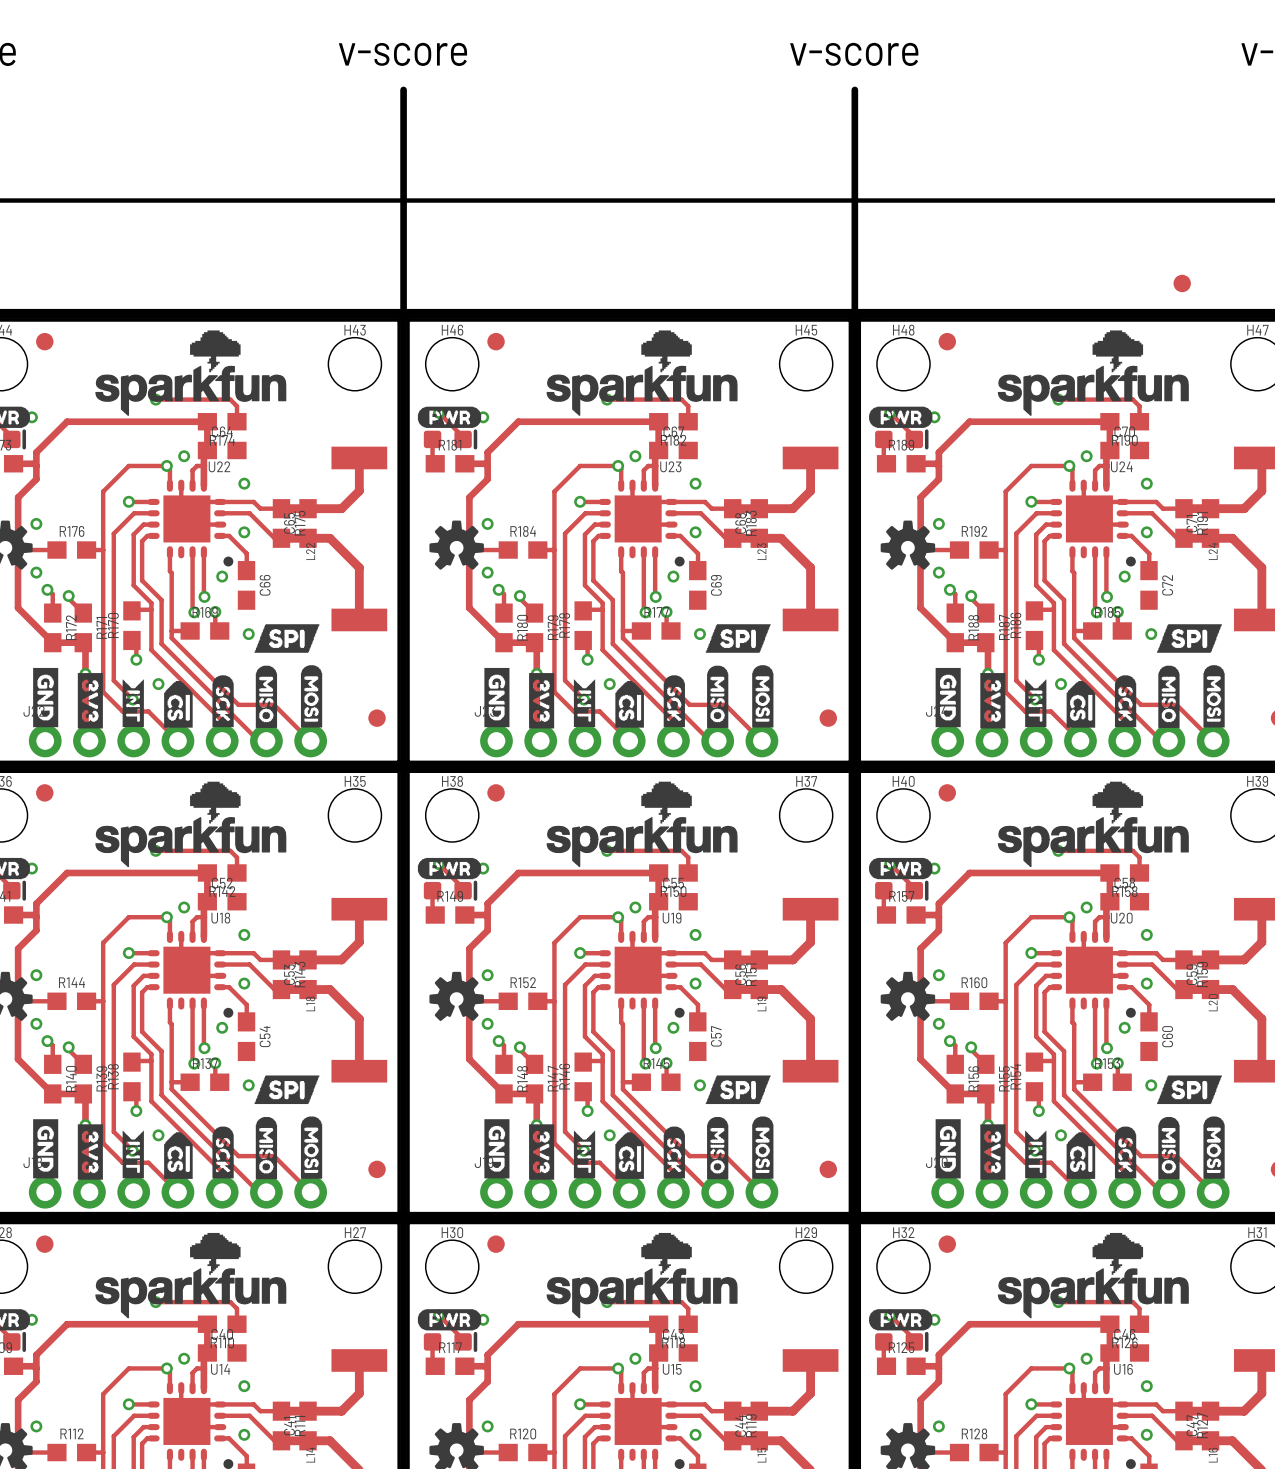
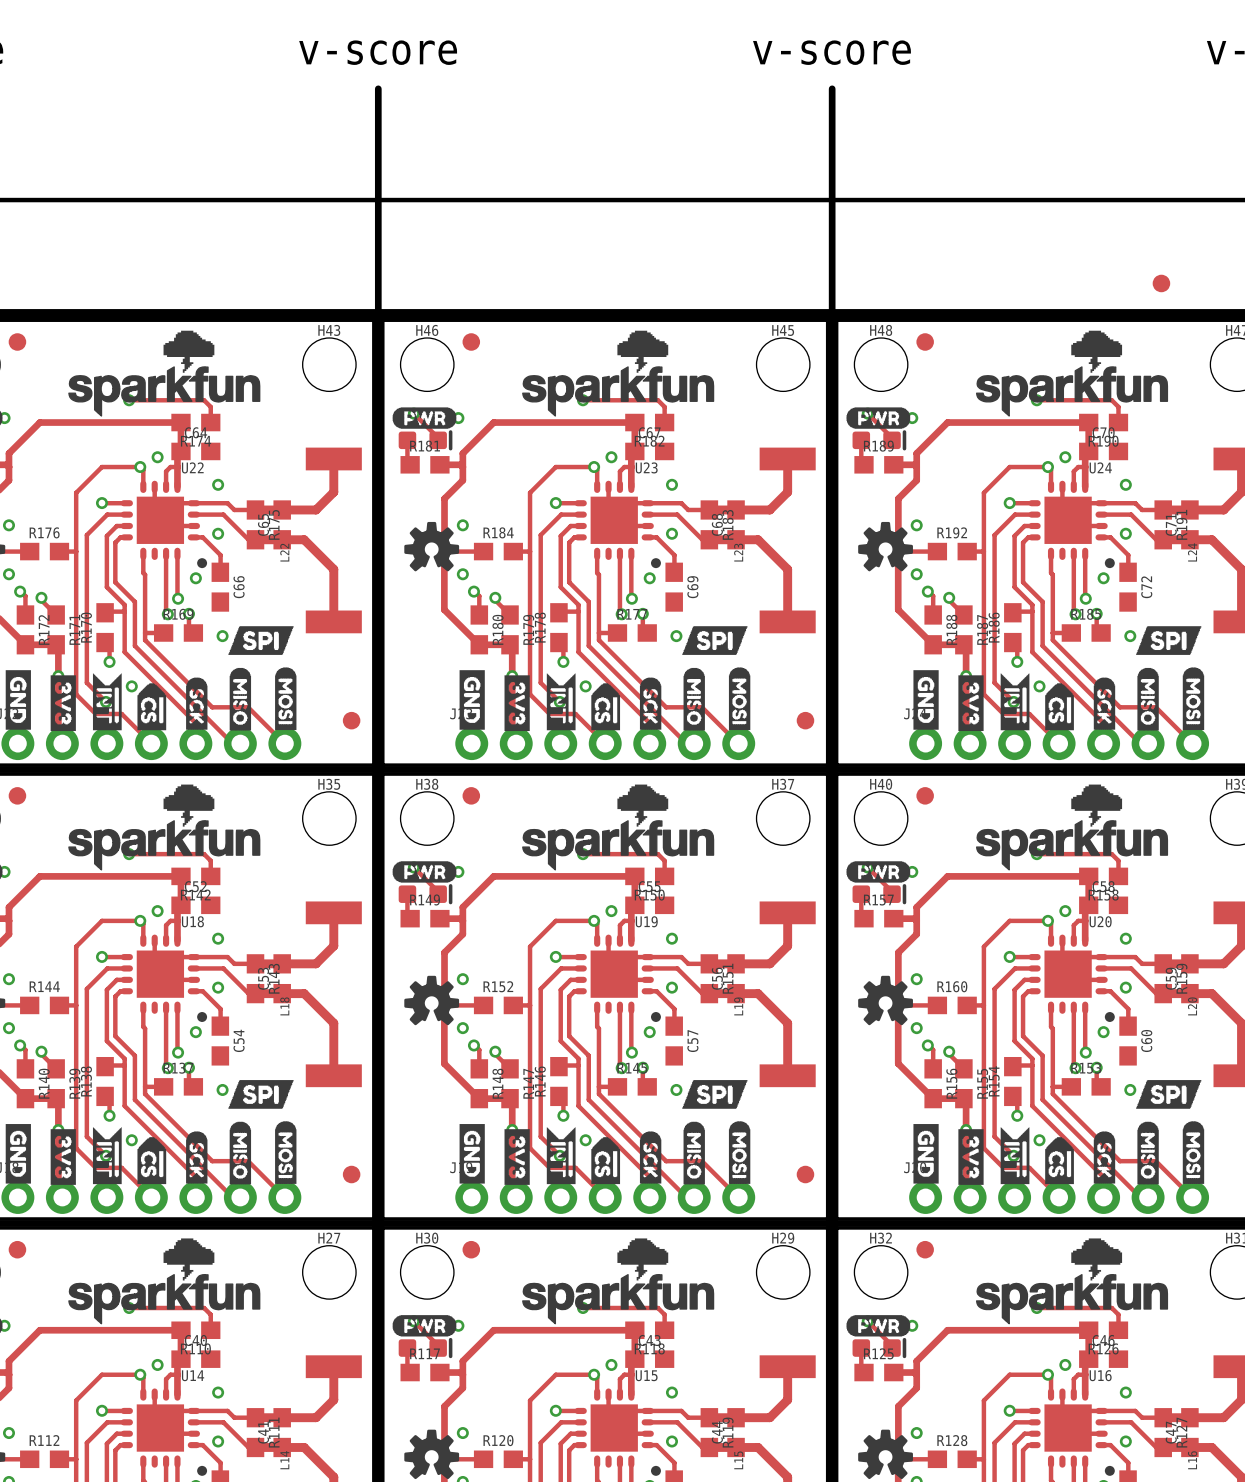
drawing shape: [122, 679, 144, 728] -> [92, 673, 122, 731]
drawing shape: [573, 679, 596, 728] -> [546, 673, 576, 731]
drawing shape: [1025, 679, 1047, 728] -> [1000, 673, 1030, 731]
drawing shape: [122, 1130, 144, 1179] -> [92, 1127, 122, 1185]
drawing shape: [573, 1130, 596, 1179] -> [546, 1127, 576, 1185]
drawing shape: [1025, 1130, 1047, 1179] -> [1000, 1127, 1030, 1185]

